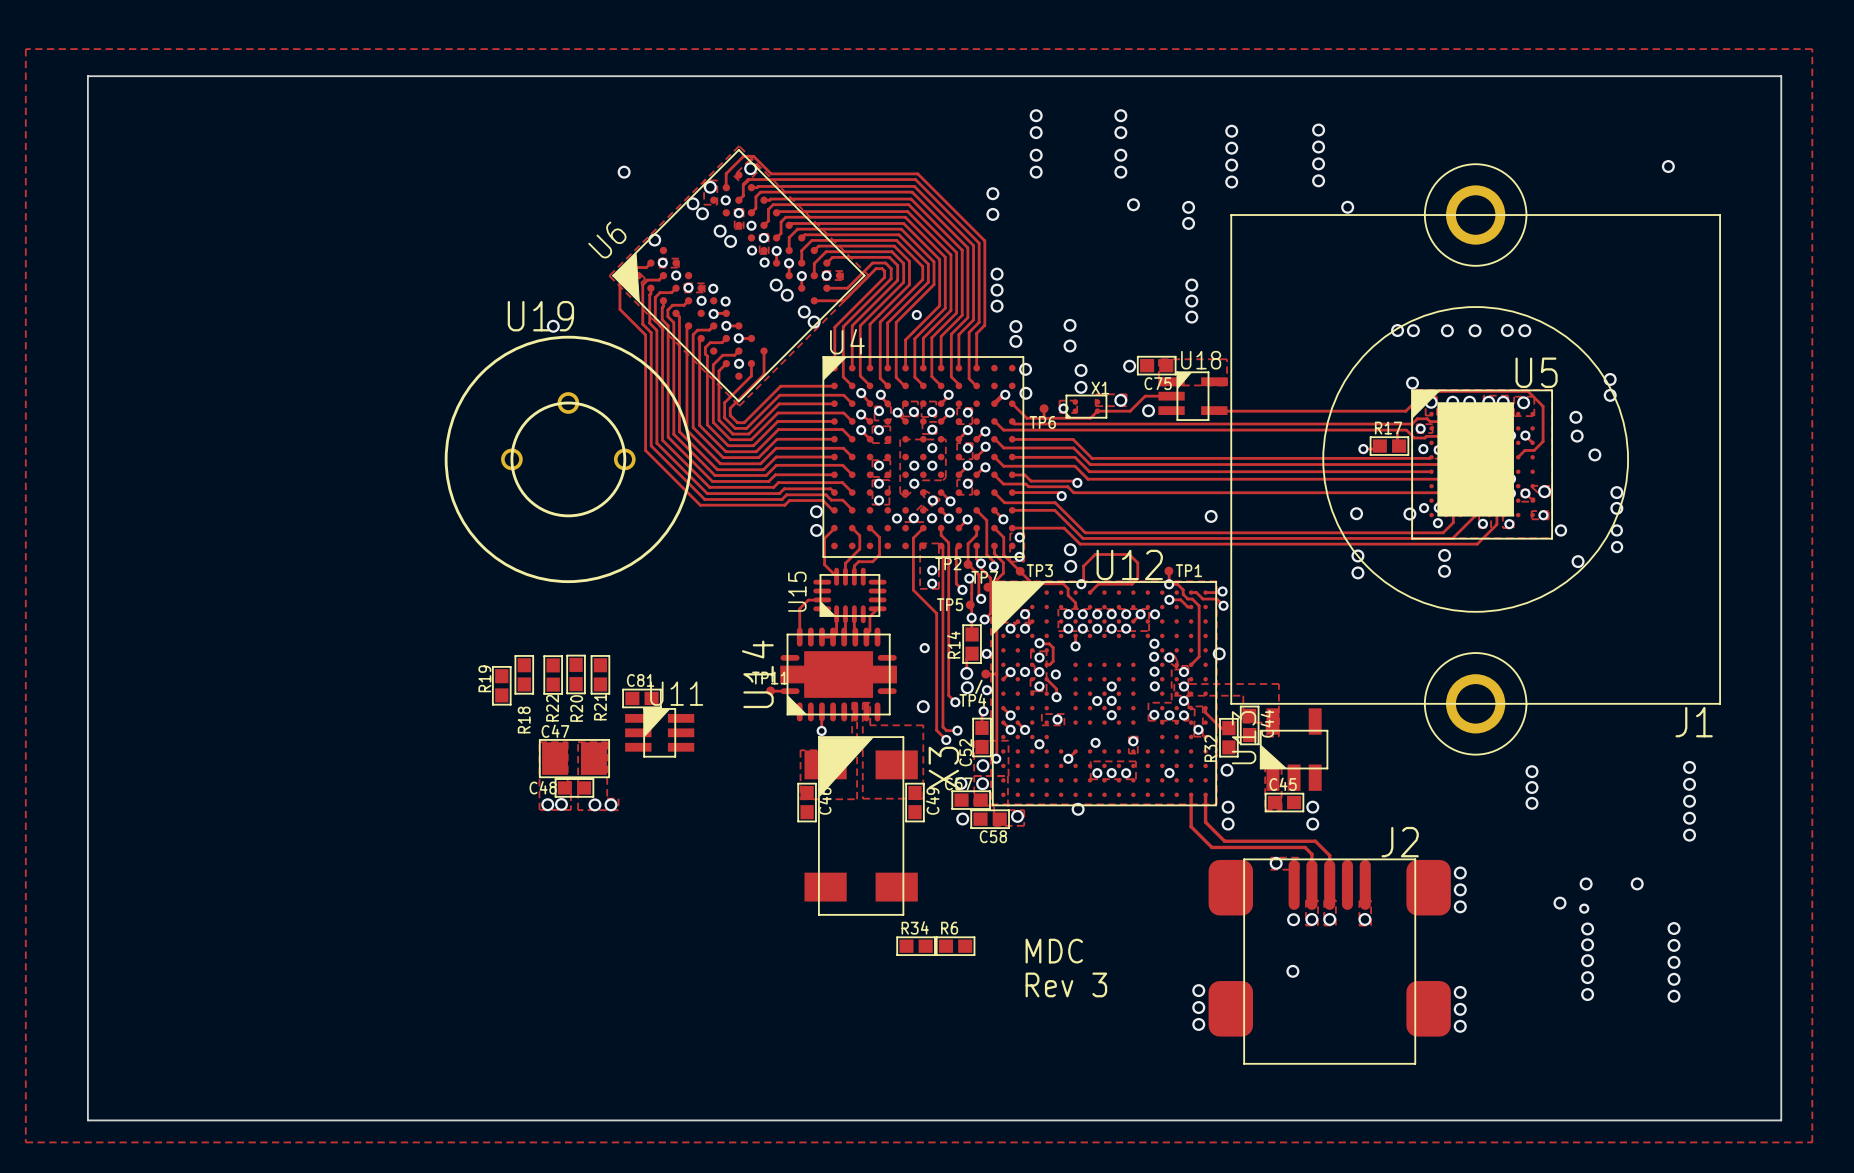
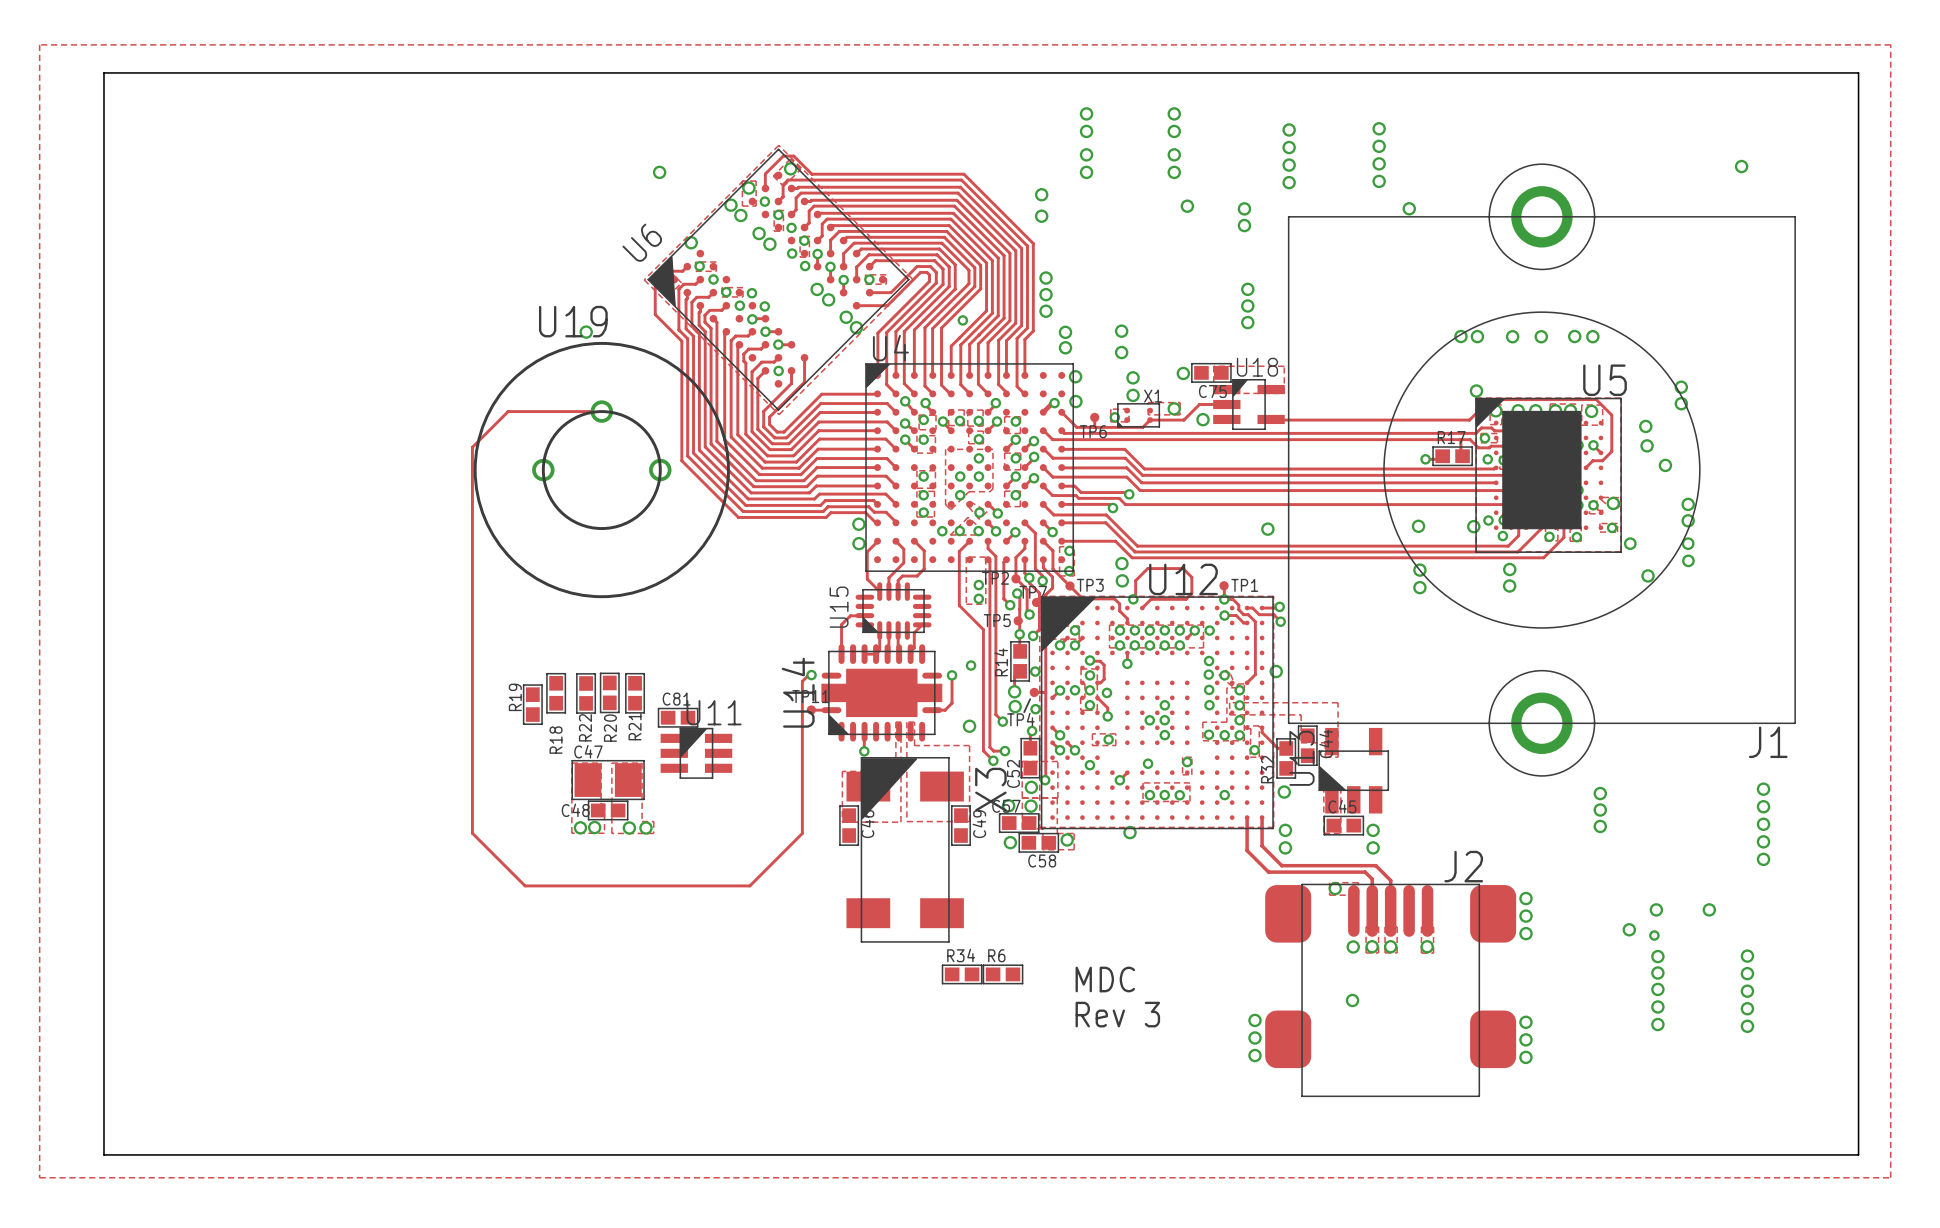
track: none -> (601, 411) (508, 411) (472, 447) (472, 833) (525, 885) (749, 885) (802, 833) (802, 681) (808, 675) (811, 675)
via: none -> (811, 675)
track: none -> (952, 675) (952, 703) (945, 710) (932, 710)
via: none -> (952, 675)

